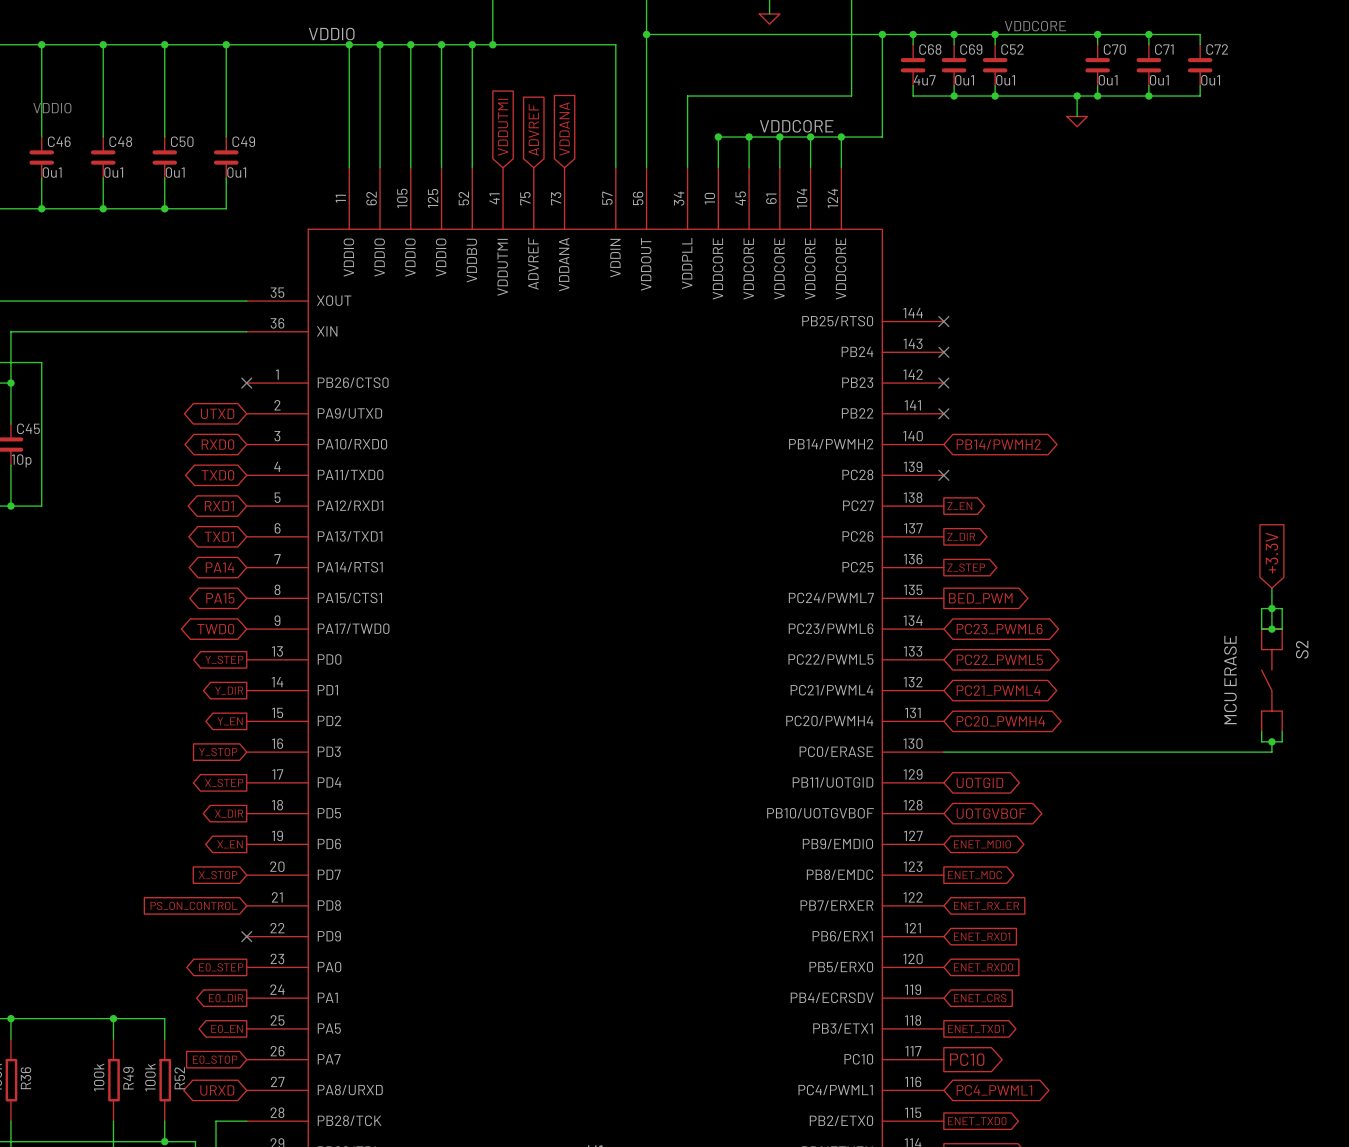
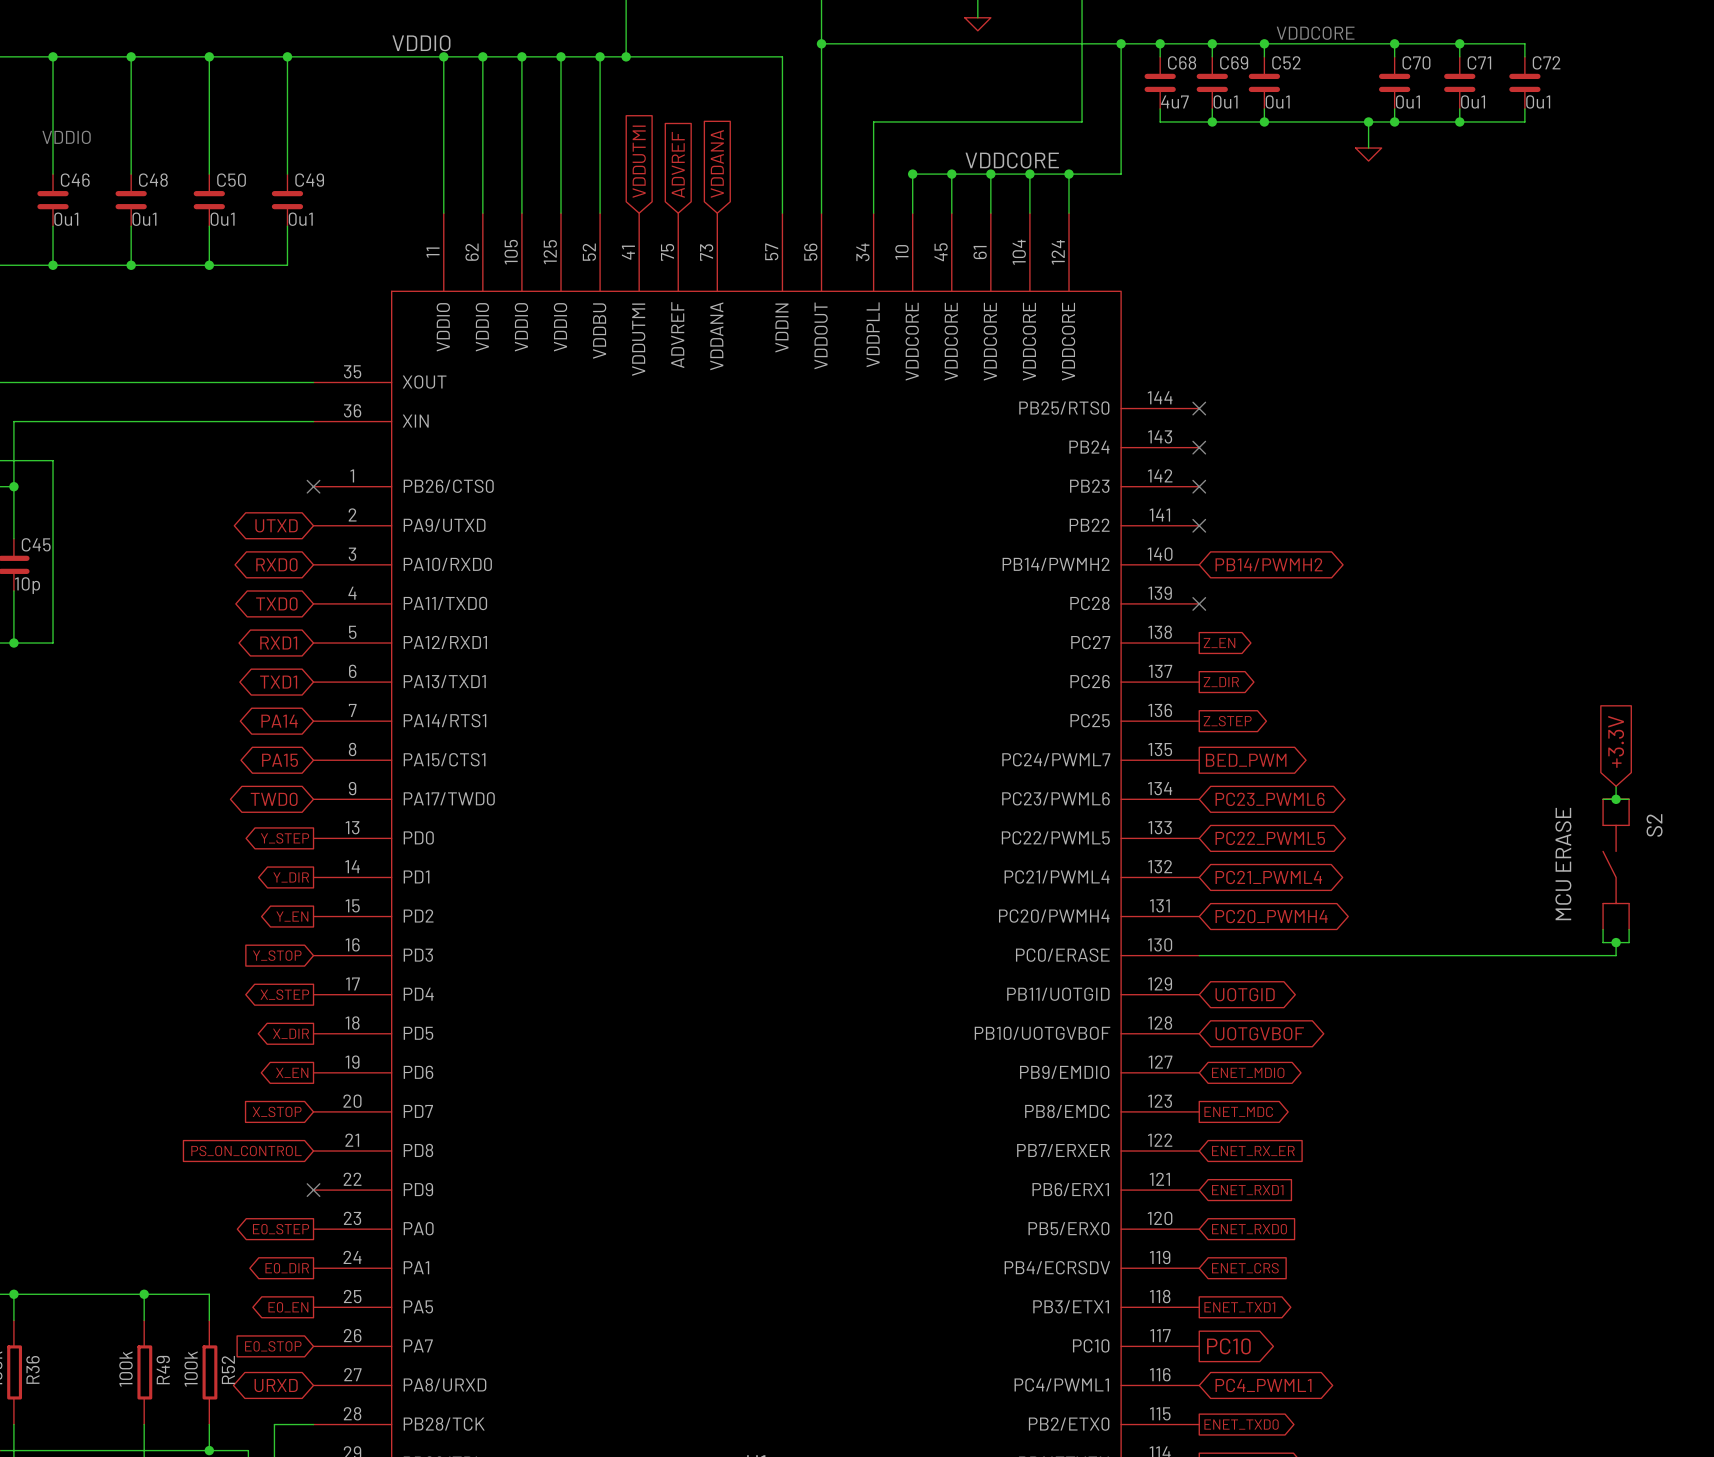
global label position: +3.3V (1271, 553) -> +3.3V (1616, 741)
wire: (1271, 588) (1271, 618) -> none
junction: (1271, 608) -> none
wire: (1261, 629) (1261, 608) (1282, 608) (1282, 629) -> none

